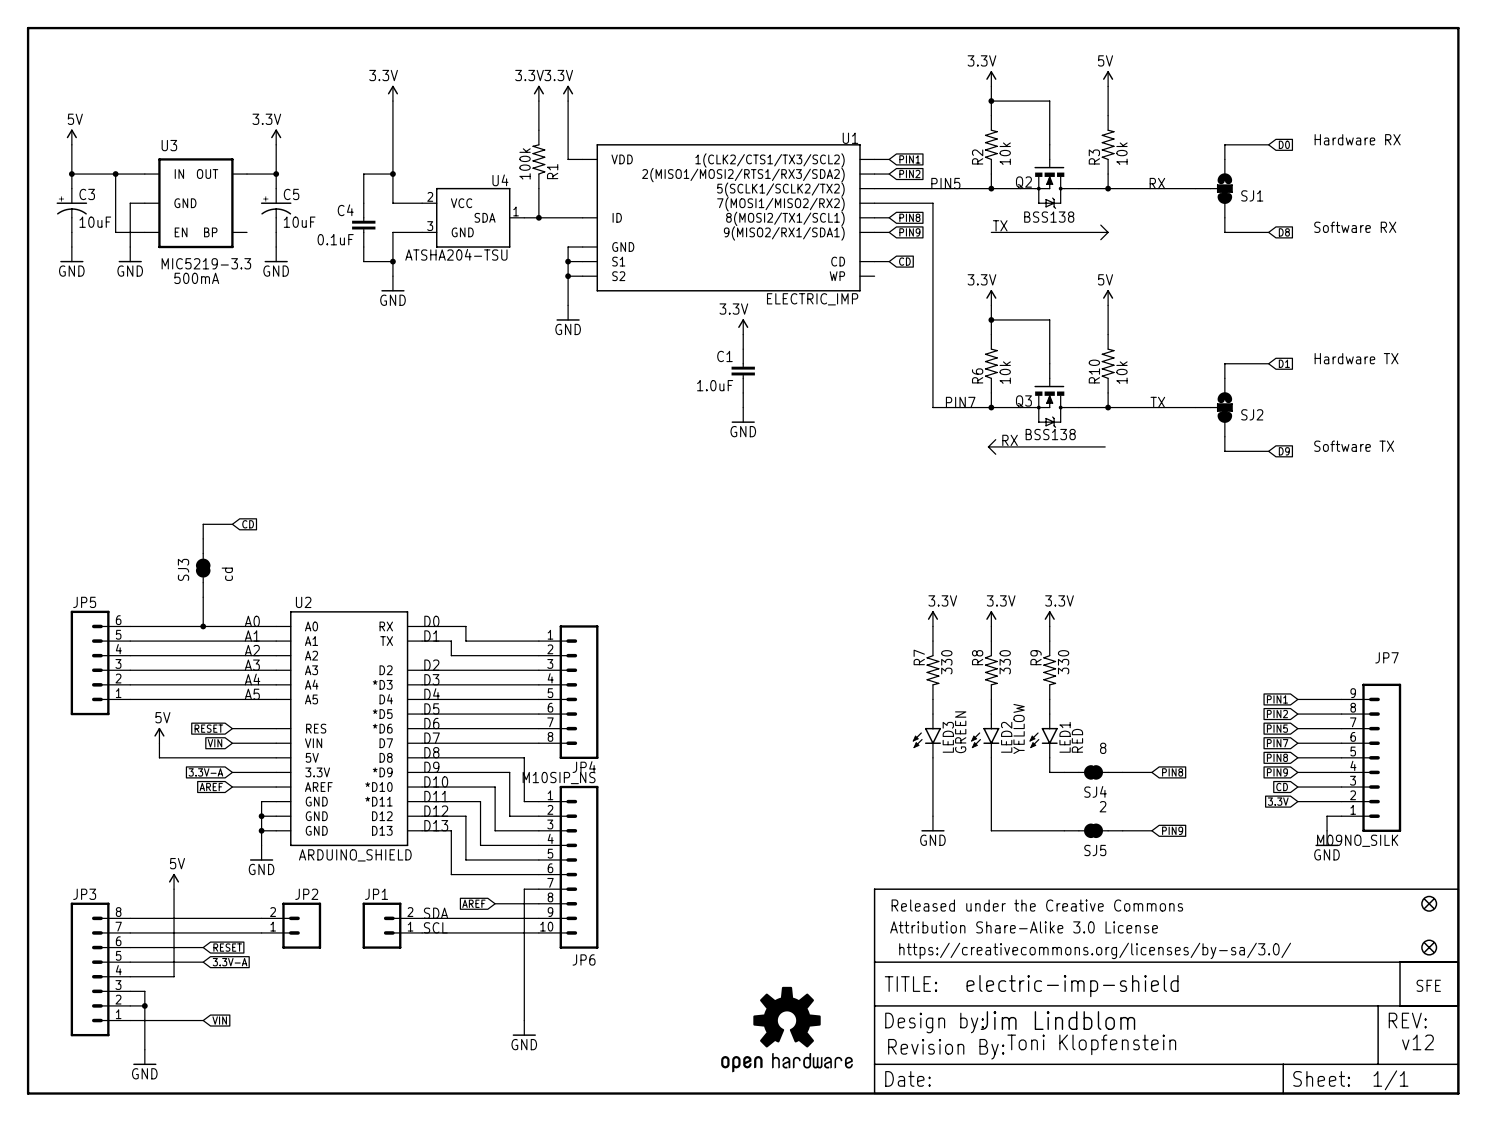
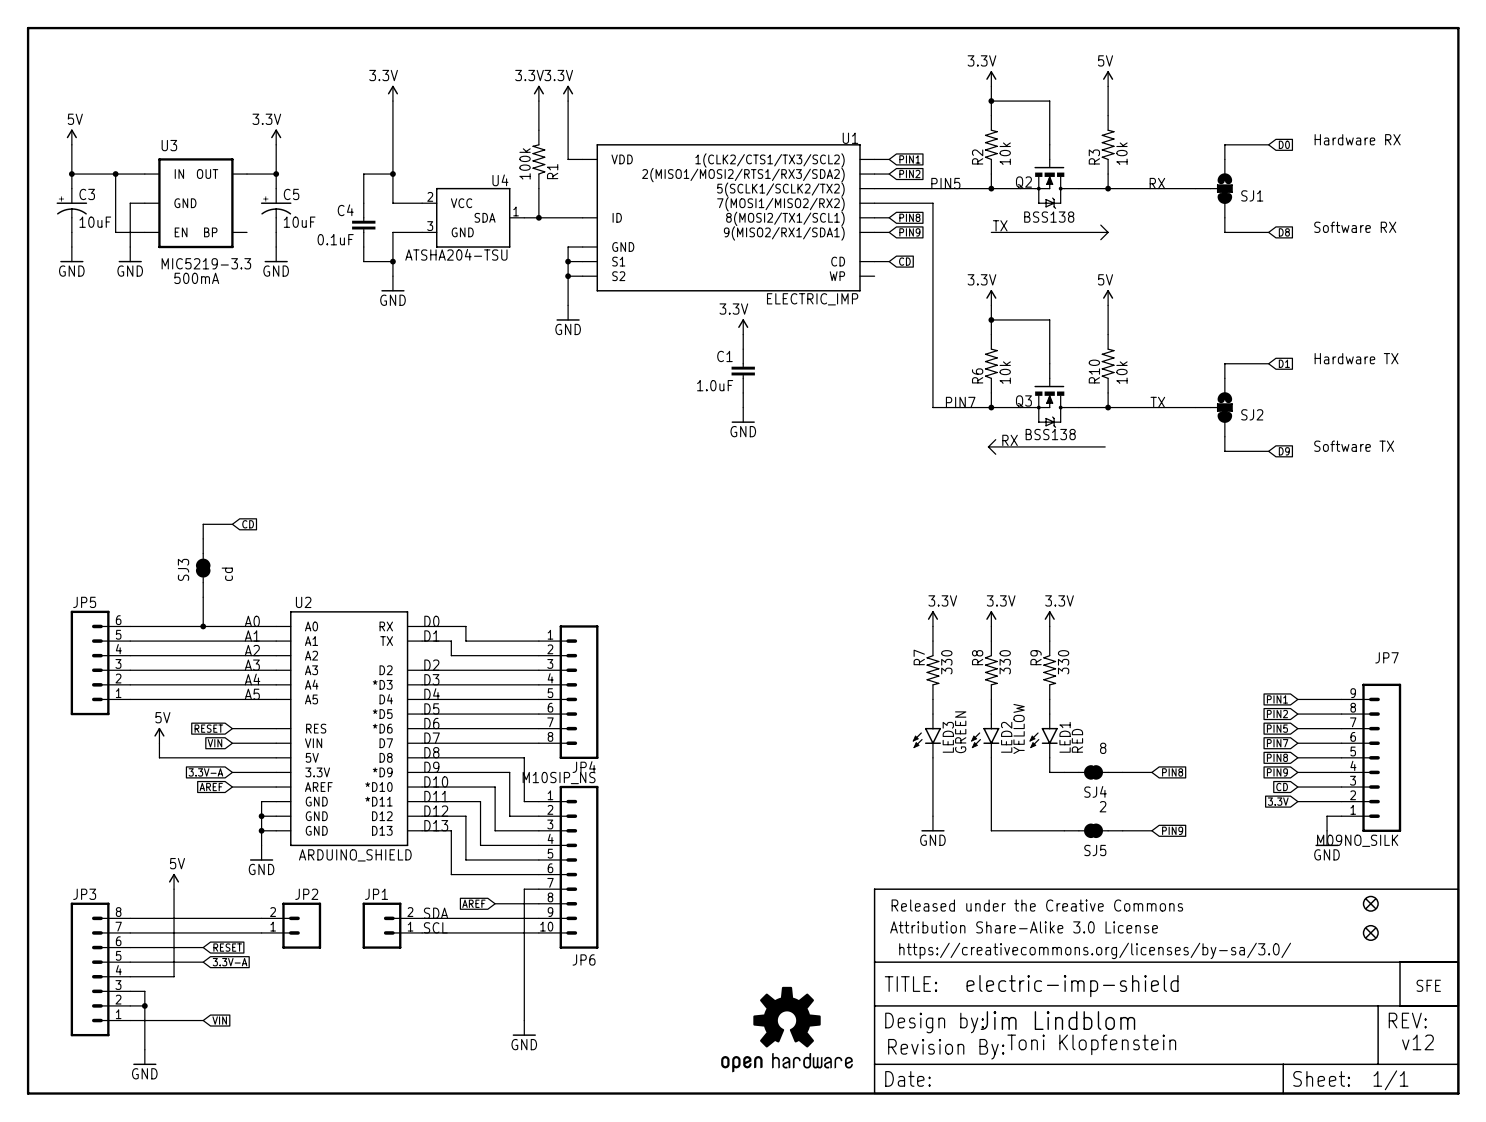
part: none -> (1370, 903)
part: (1429, 903) -> none
part: none -> (1370, 932)
part: (1429, 947) -> none

